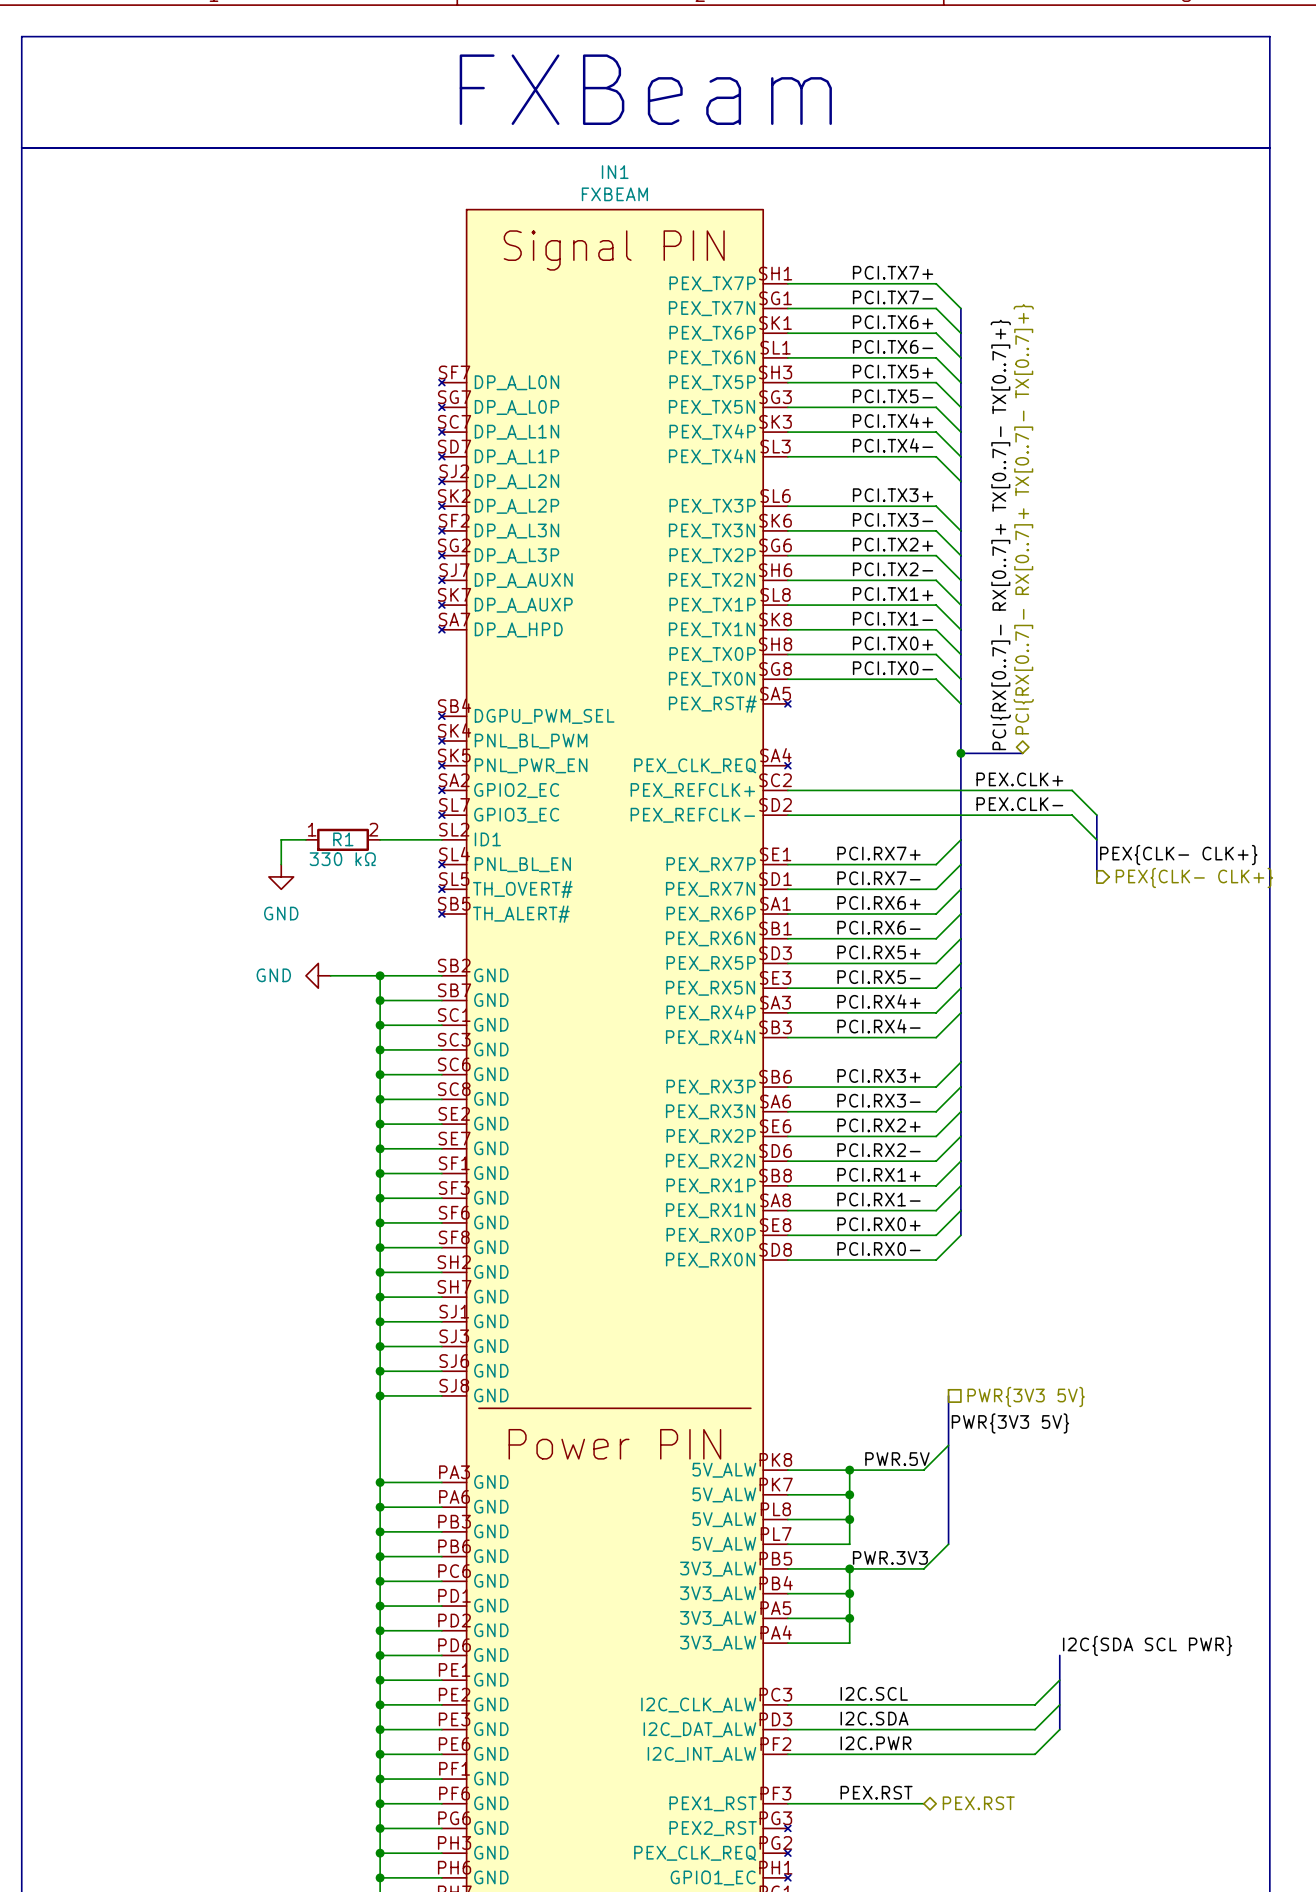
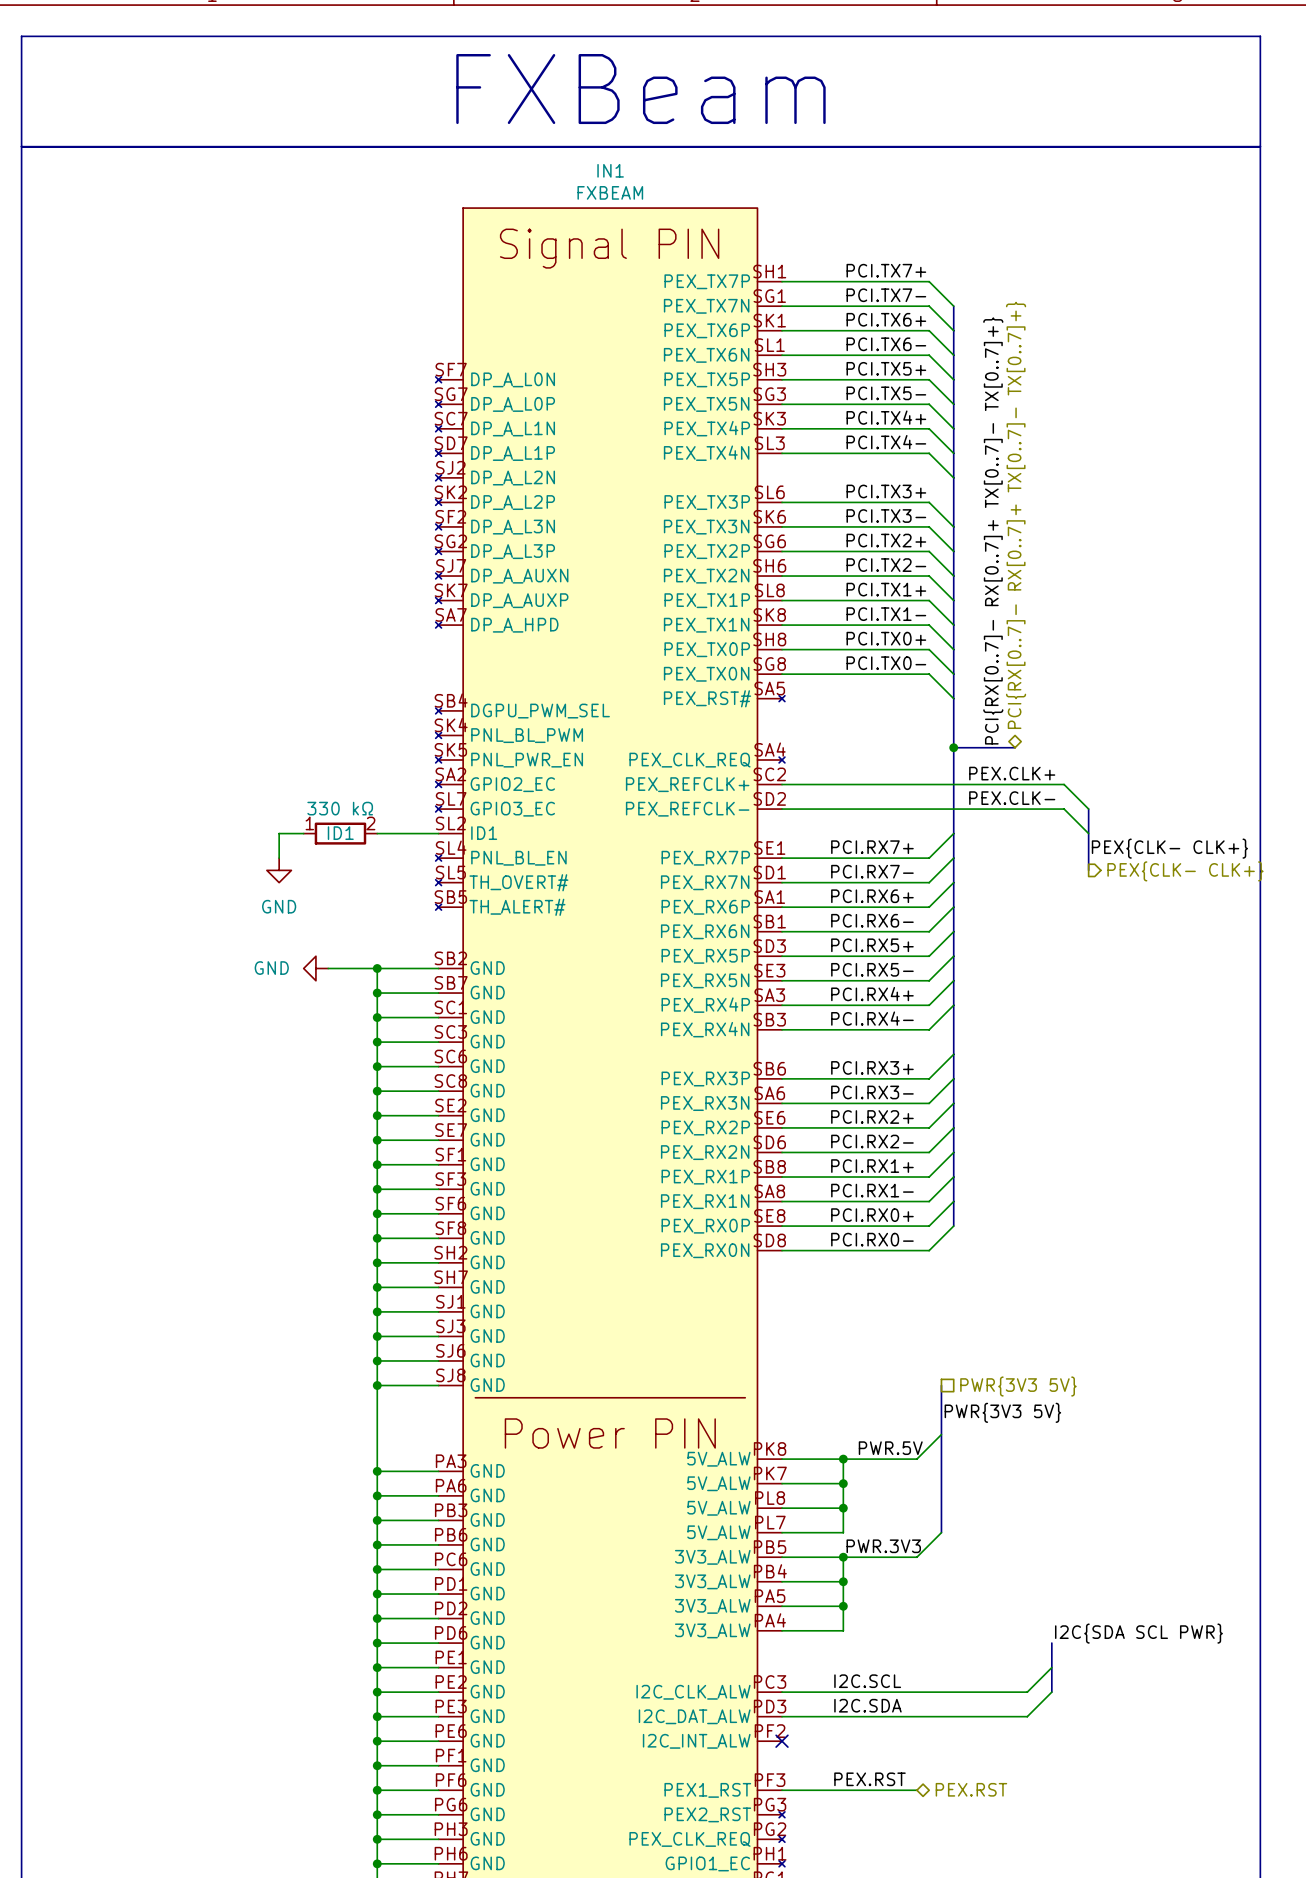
R1 name: R1 (343, 839) -> ID1 (340, 833)
R1 text position: 330 kΩ (342, 859) -> 330 kΩ (340, 808)
bus: (1059, 1704) (1059, 1729) -> none
wire: (1059, 1729) (1035, 1754) (787, 1754) -> none
label: I2C.PWR (875, 1743) -> none
no-connect mark: none -> (782, 1741)

